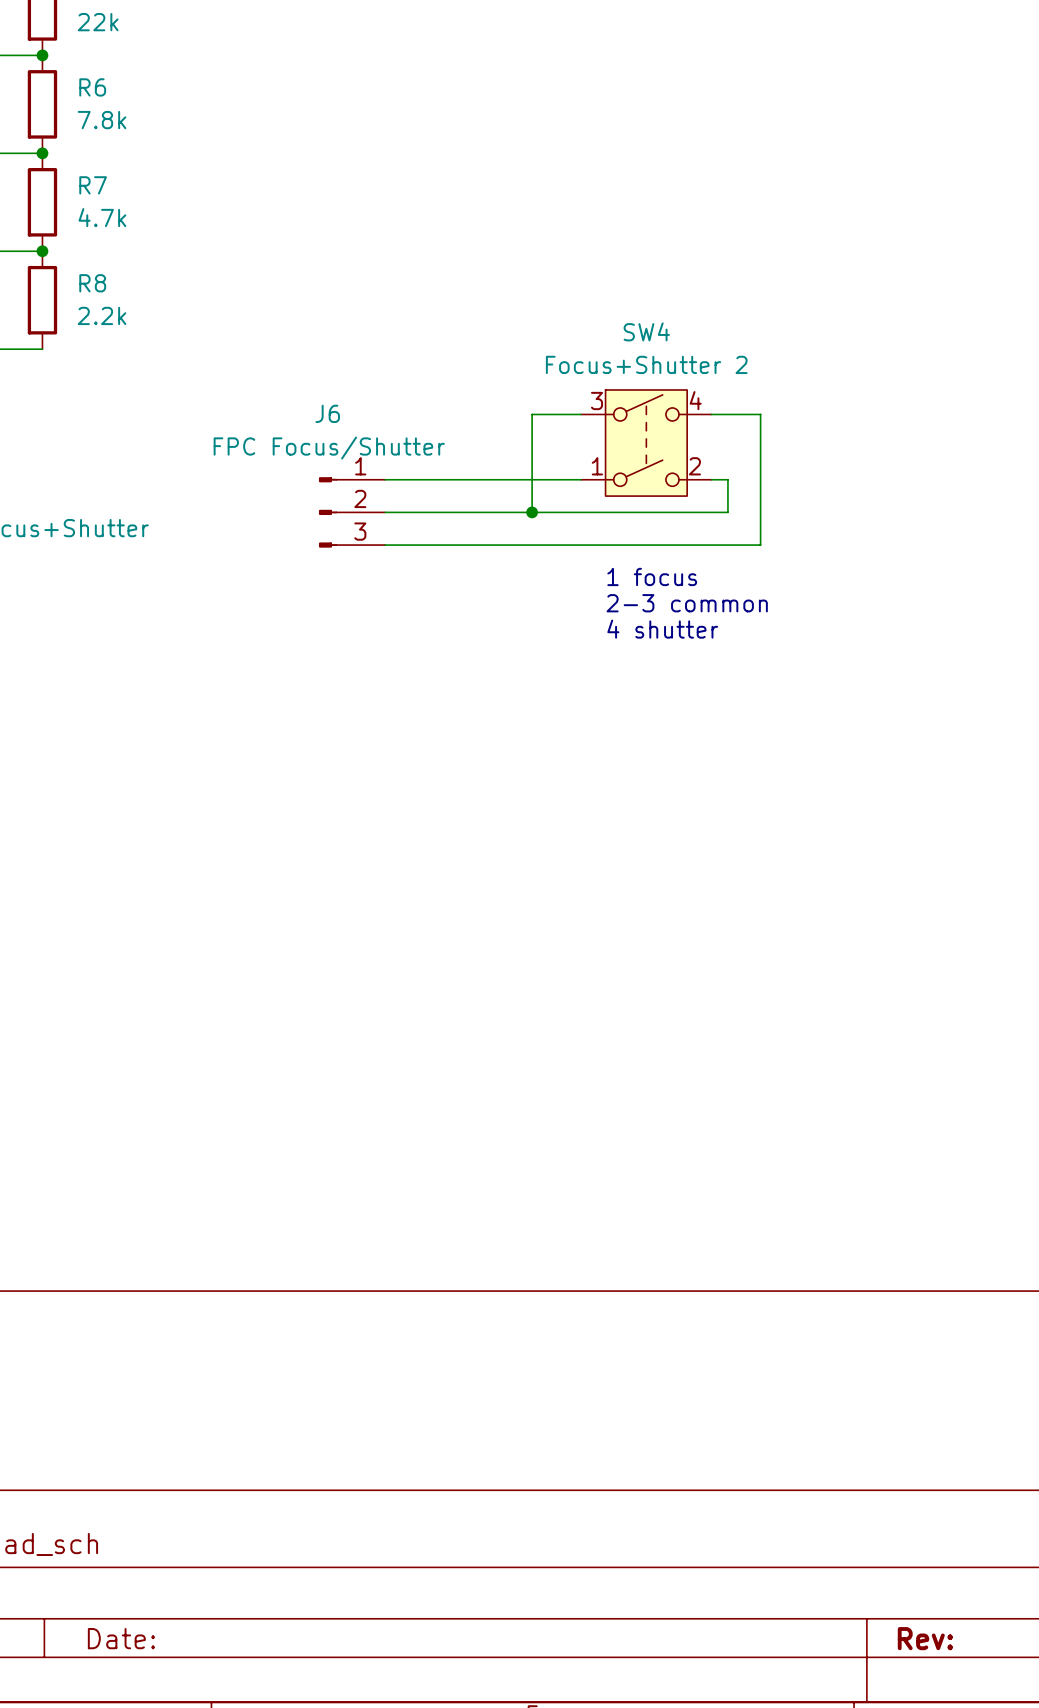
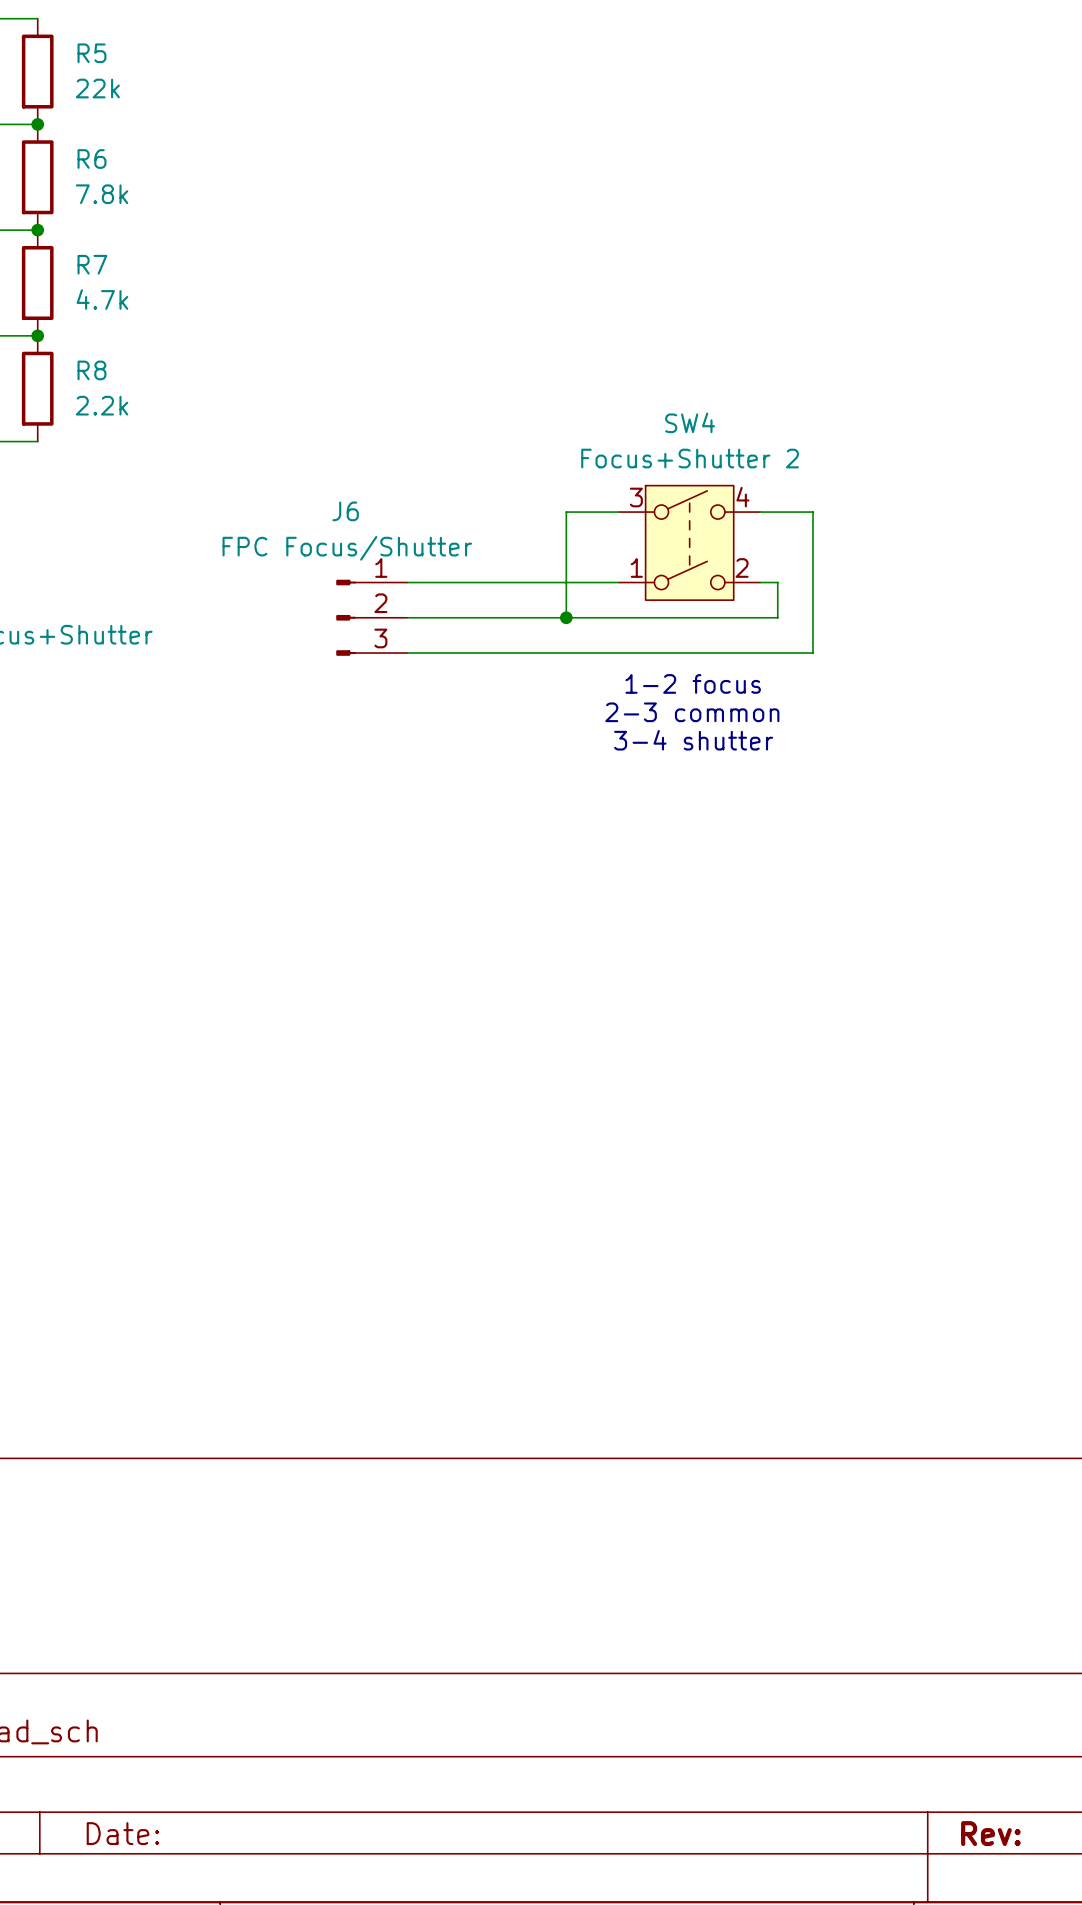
text: 1 focus (652, 576) -> 1-2 focus (693, 683)
text position: 2-3 common (687, 603) -> 2-3 common (692, 712)
text: 4 shutter (662, 629) -> 3-4 shutter (693, 740)

